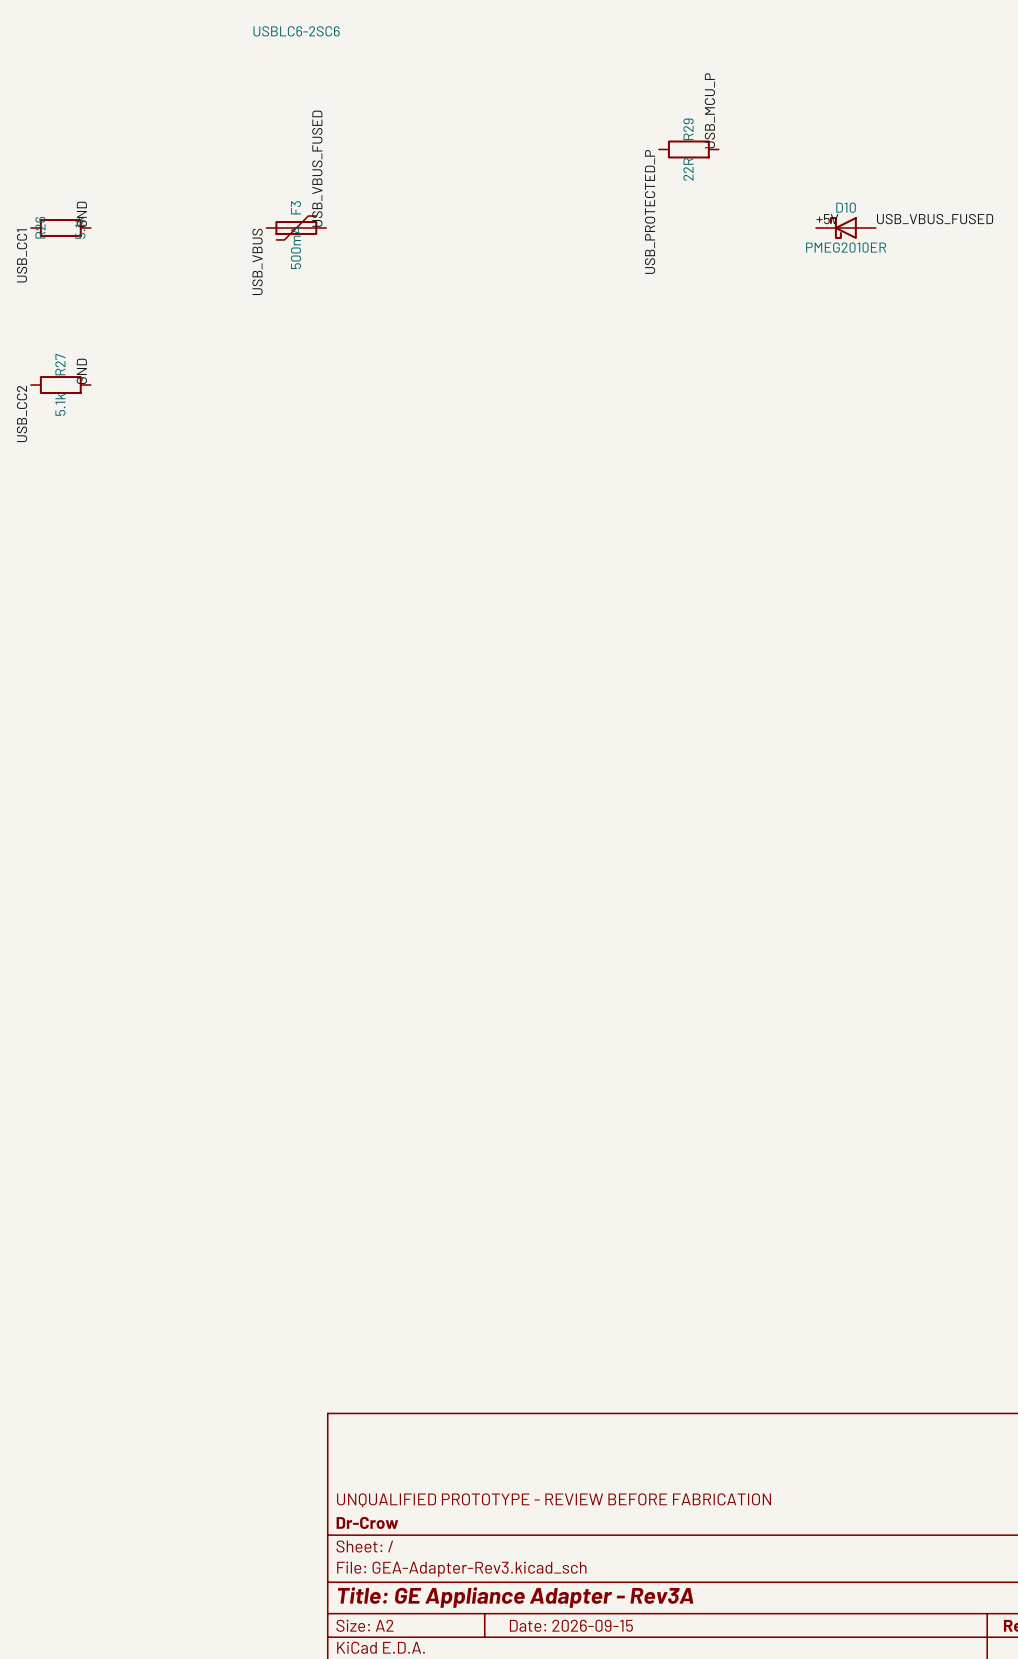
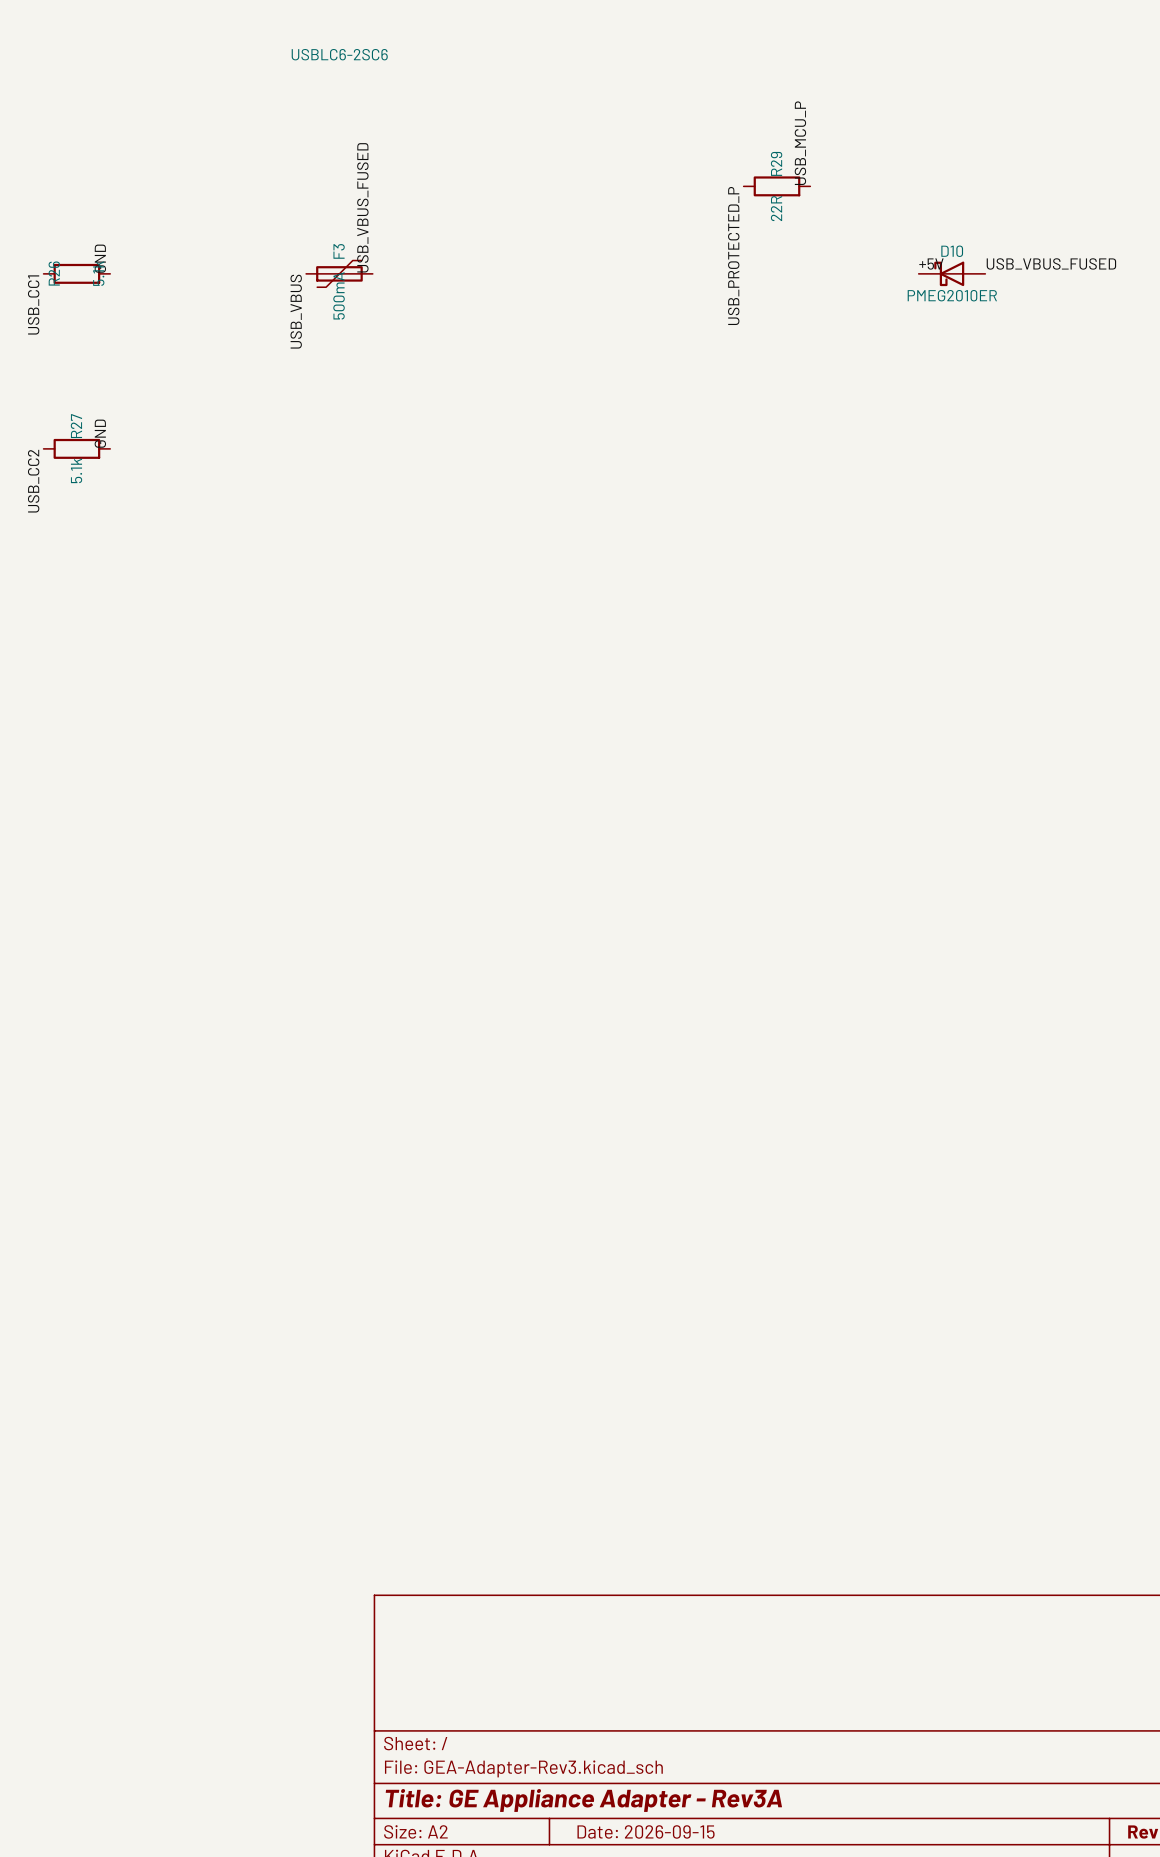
title block: UNQUALIFIED PROTOTYPE - REVIEW BEFORE FABRICATION (554, 1500) -> none
title block: Dr-Crow (367, 1522) -> none

